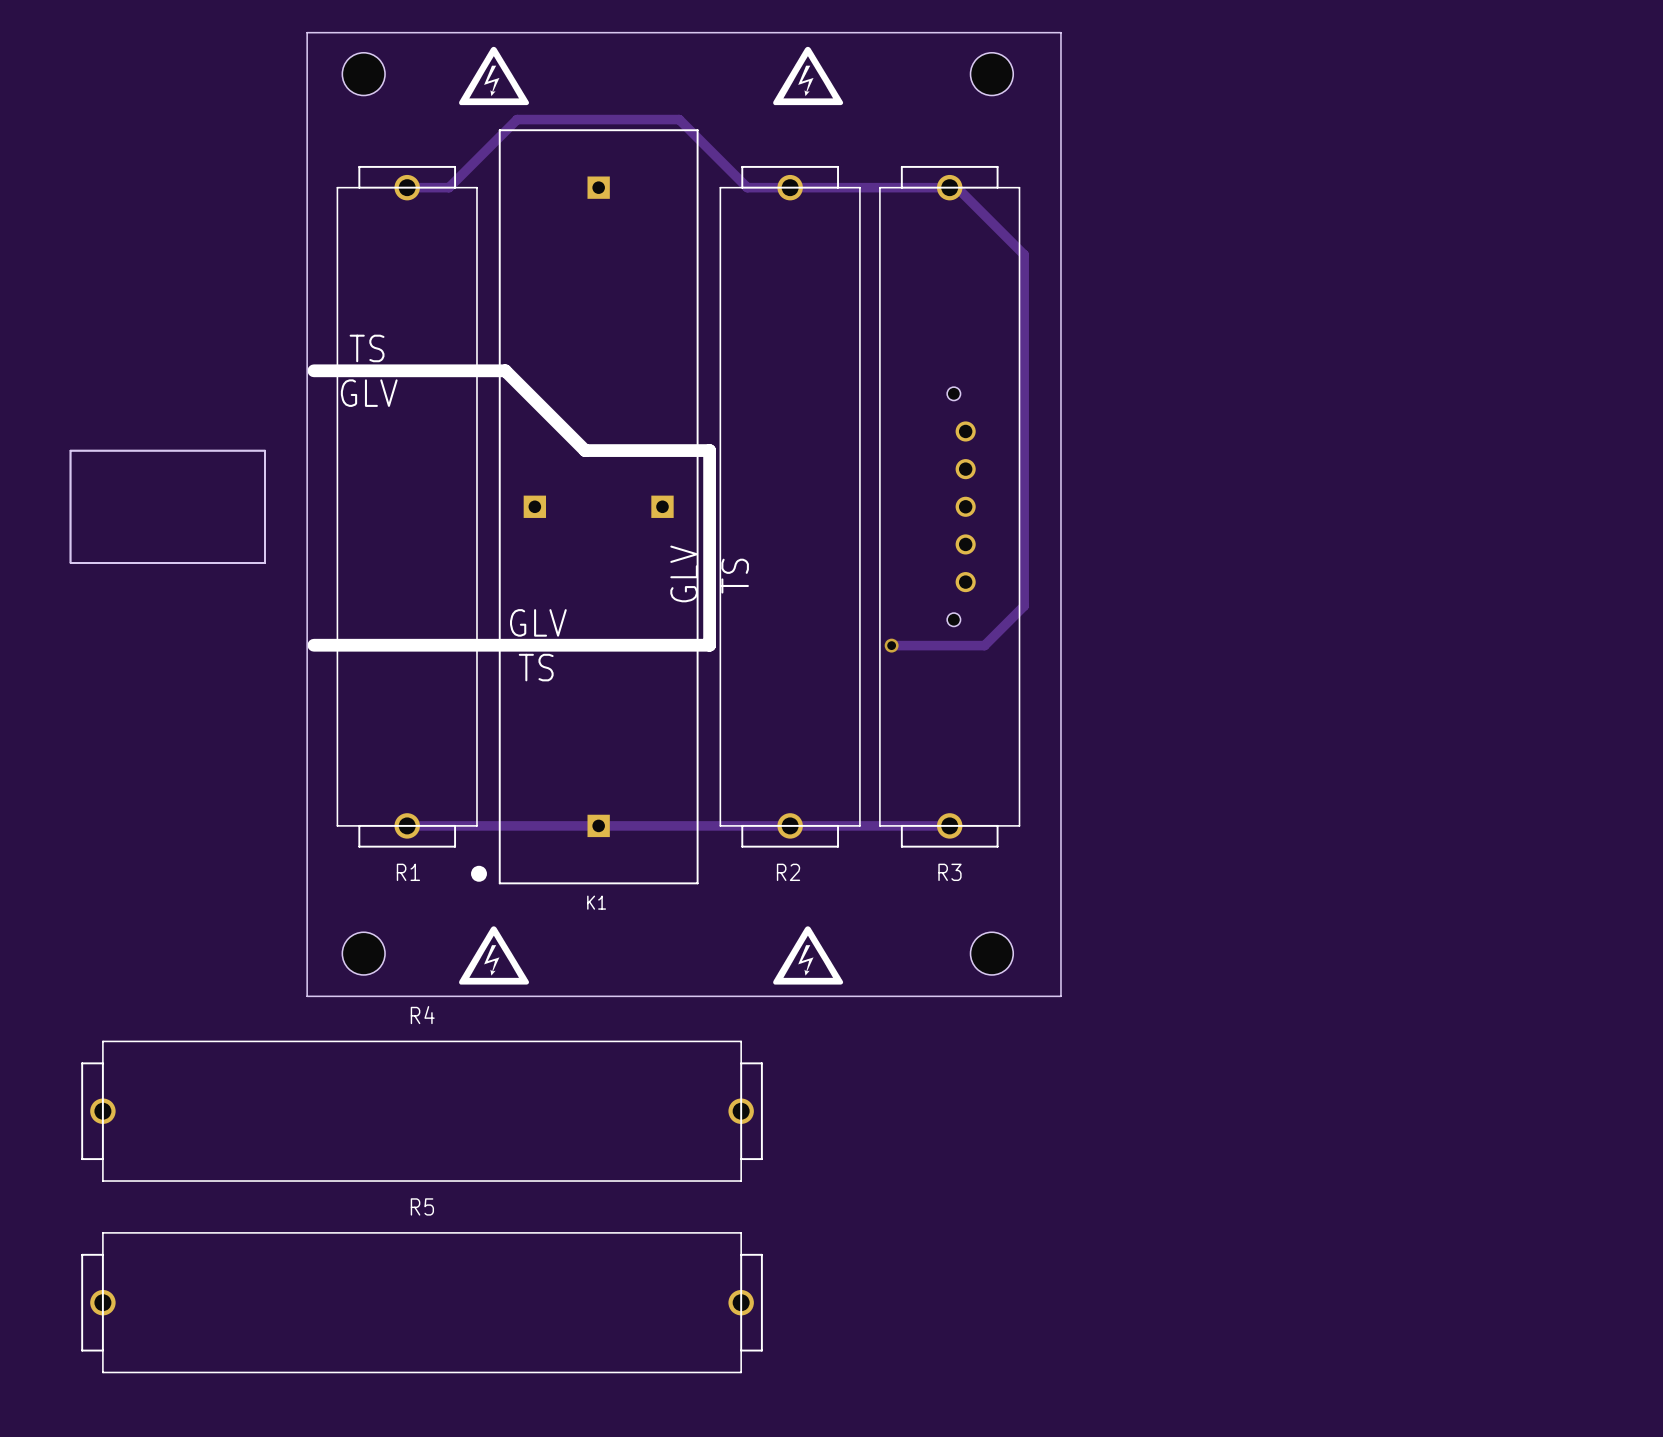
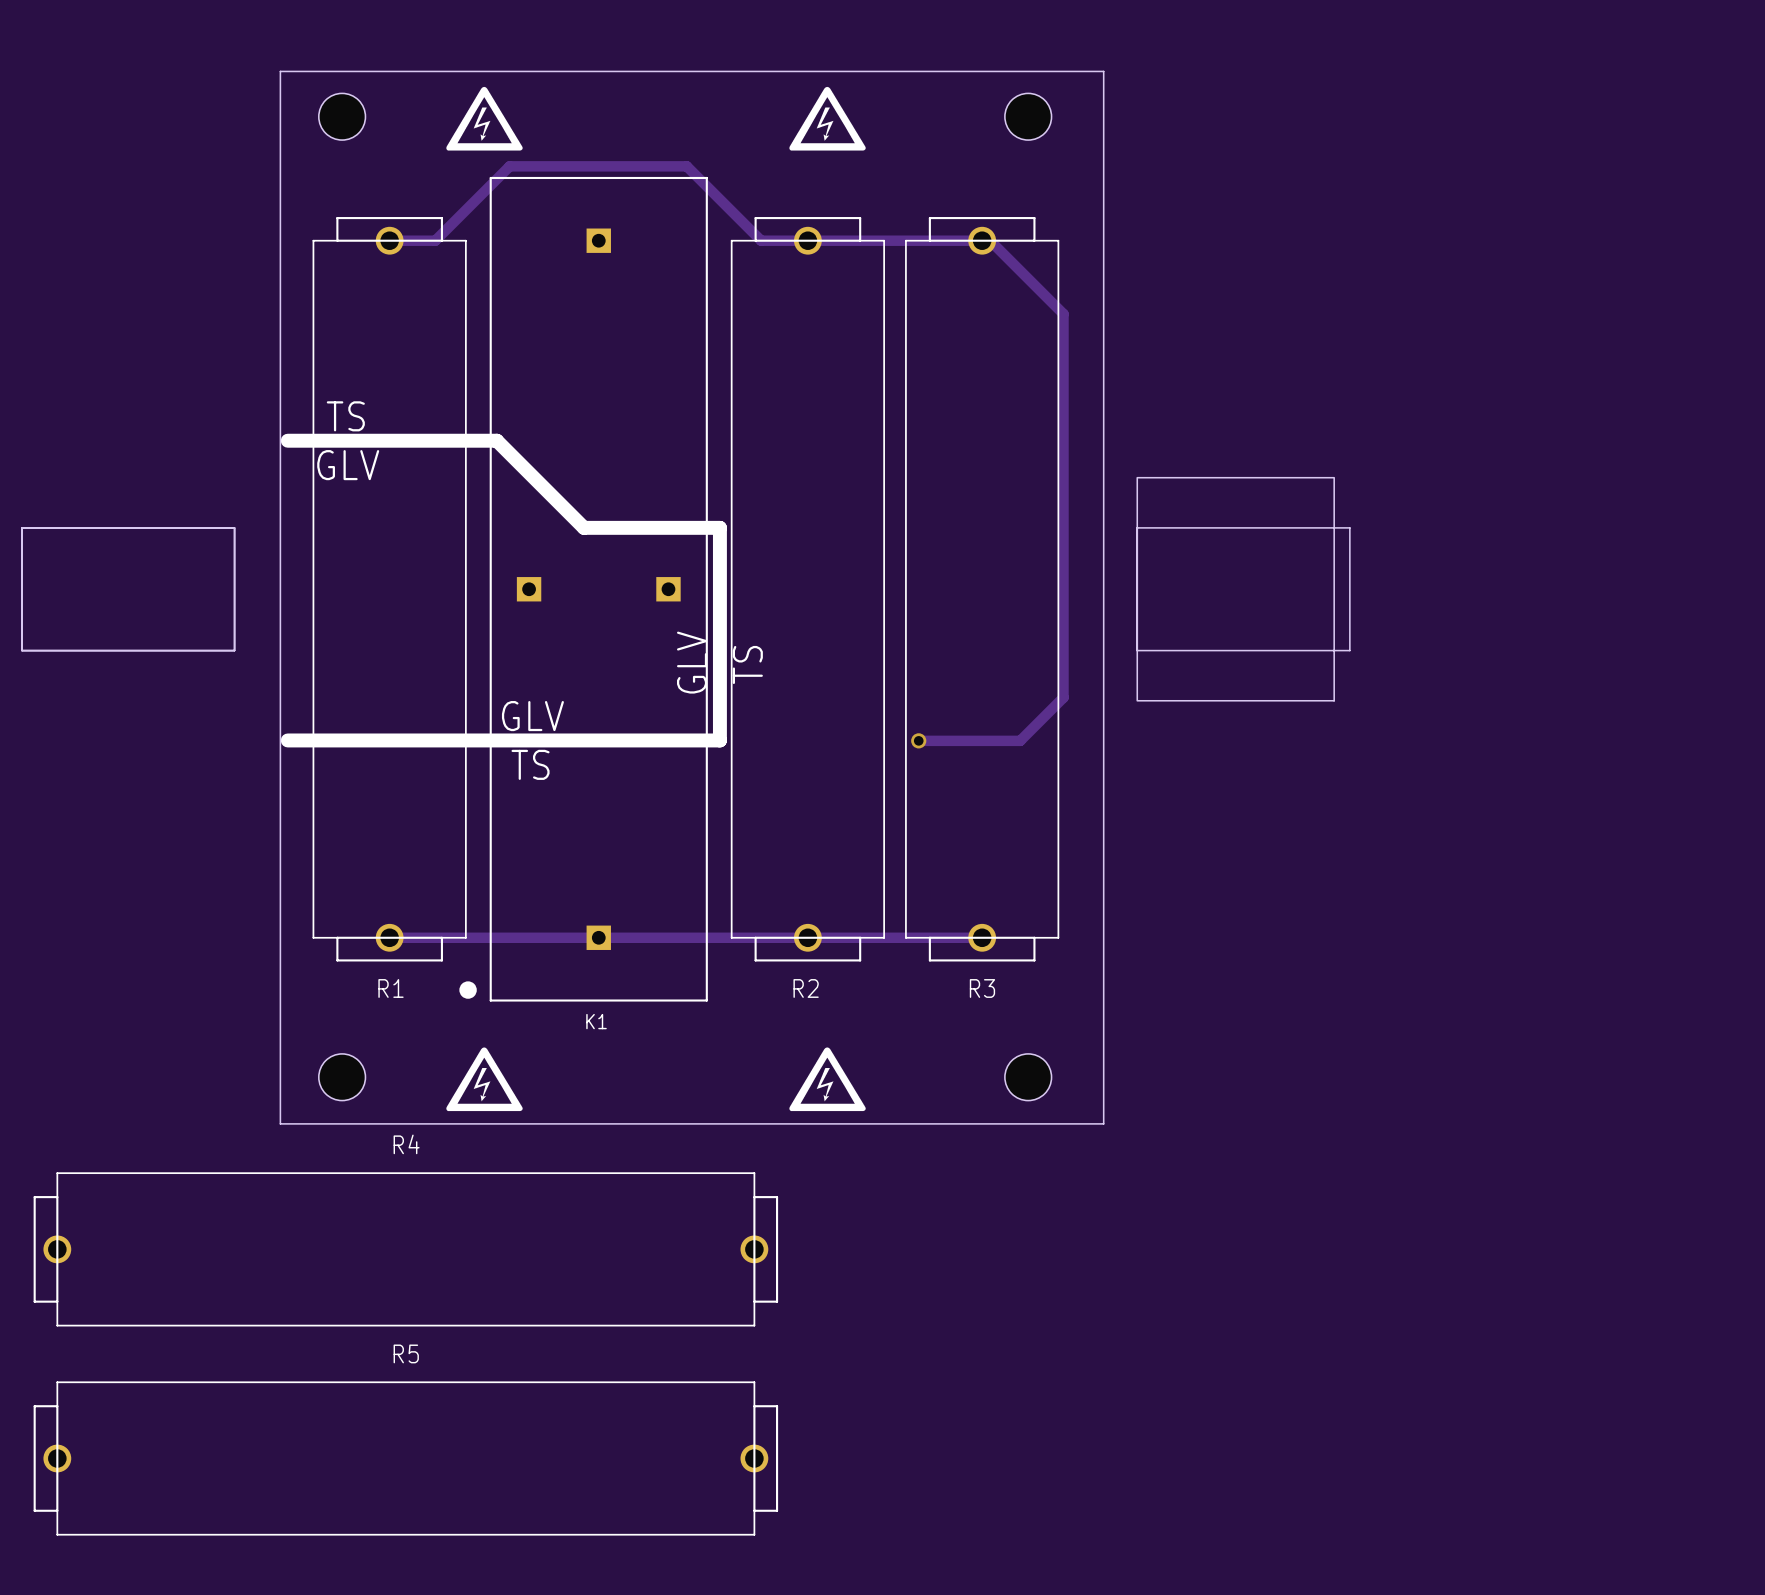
part: (961, 506) -> none
part: none -> (1243, 589)

